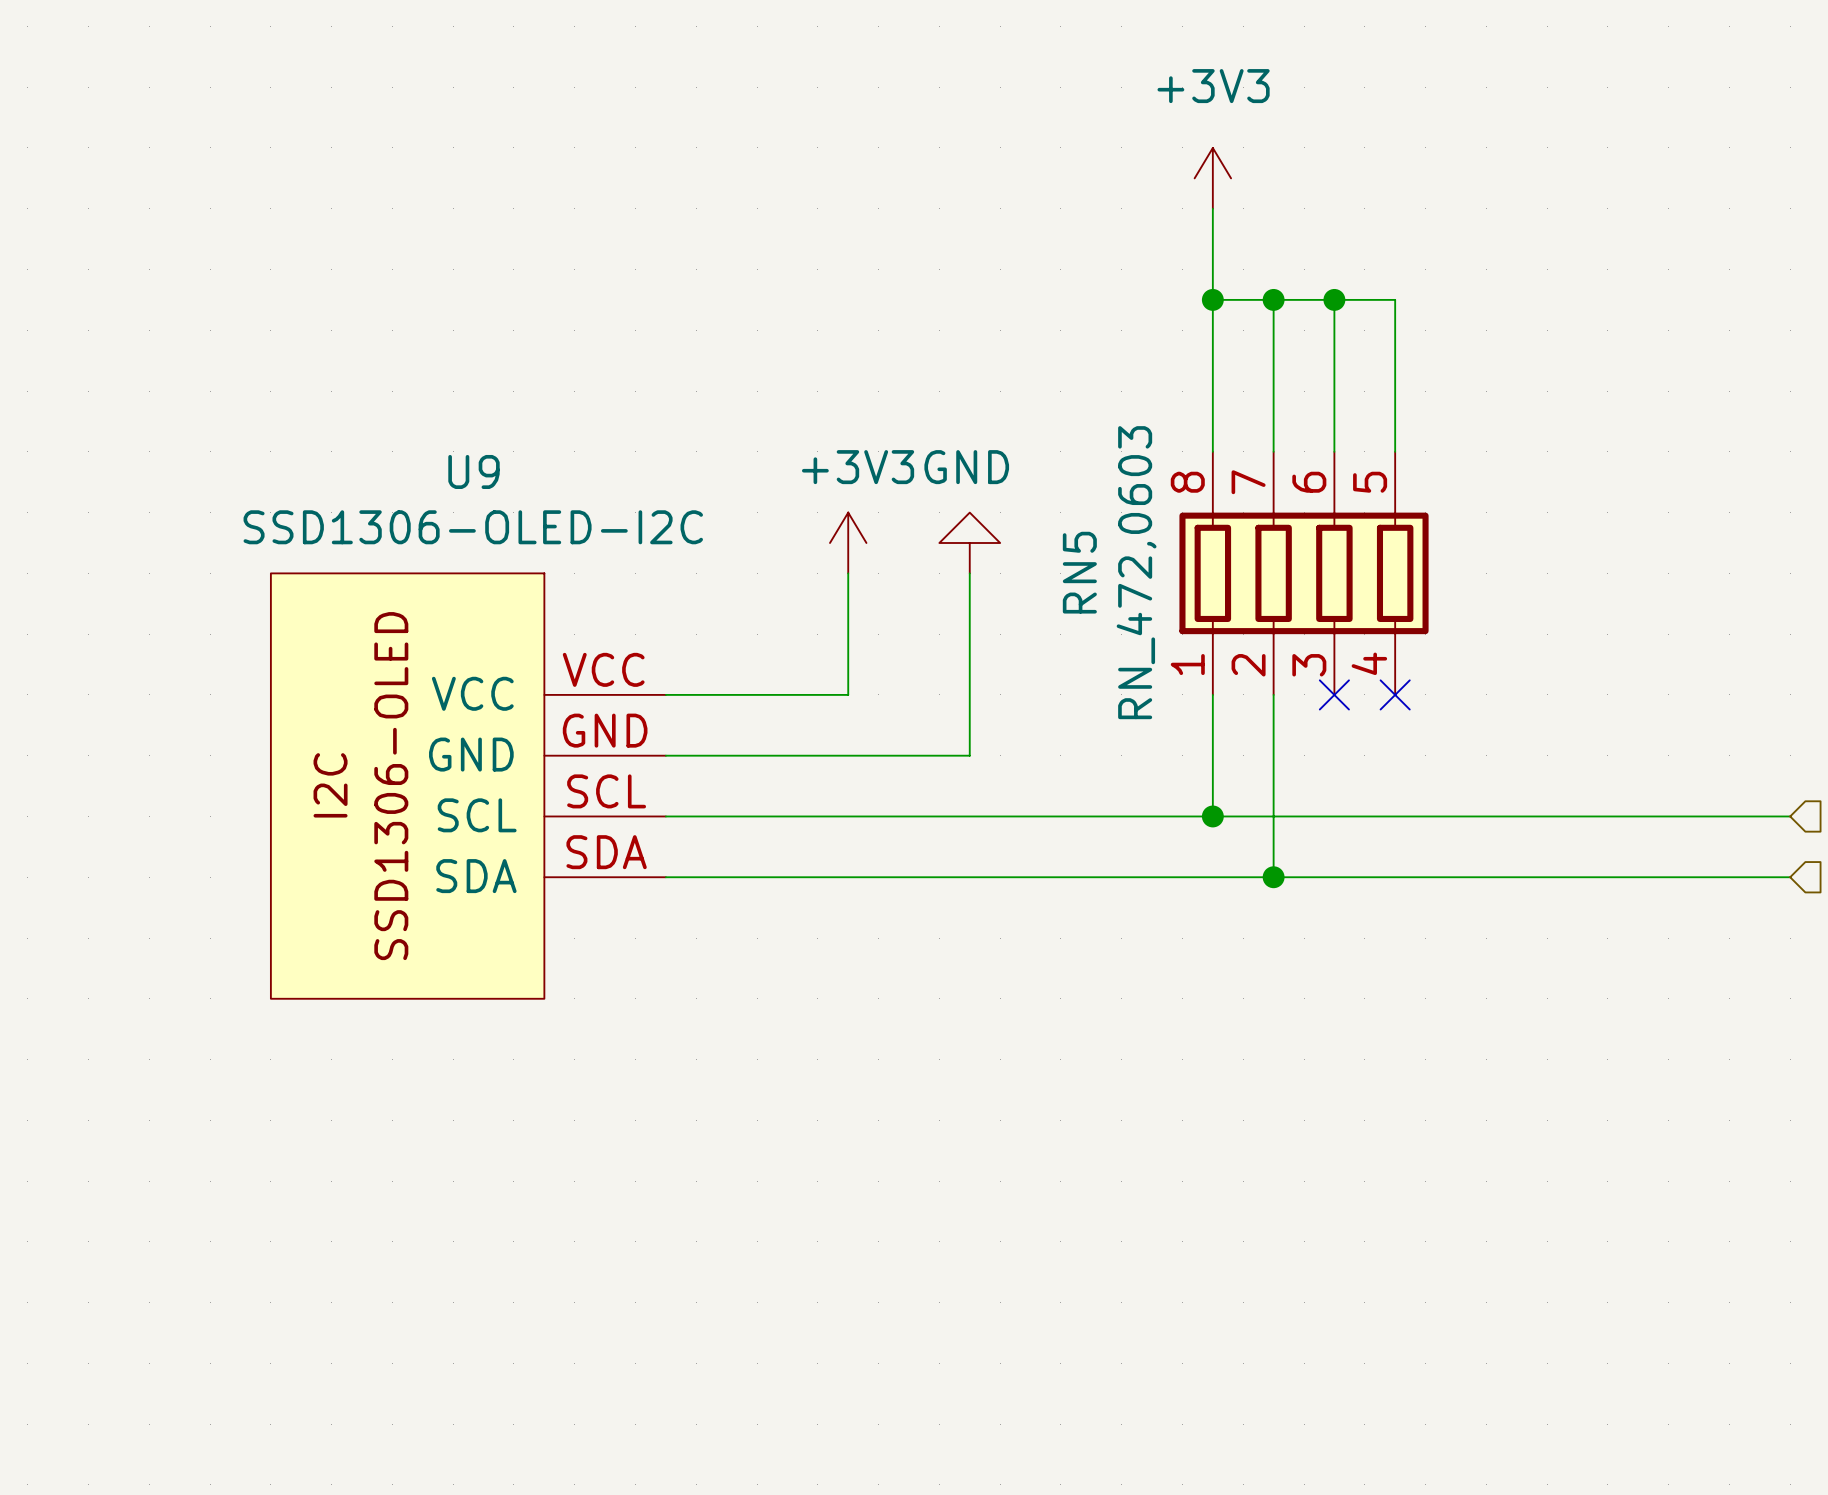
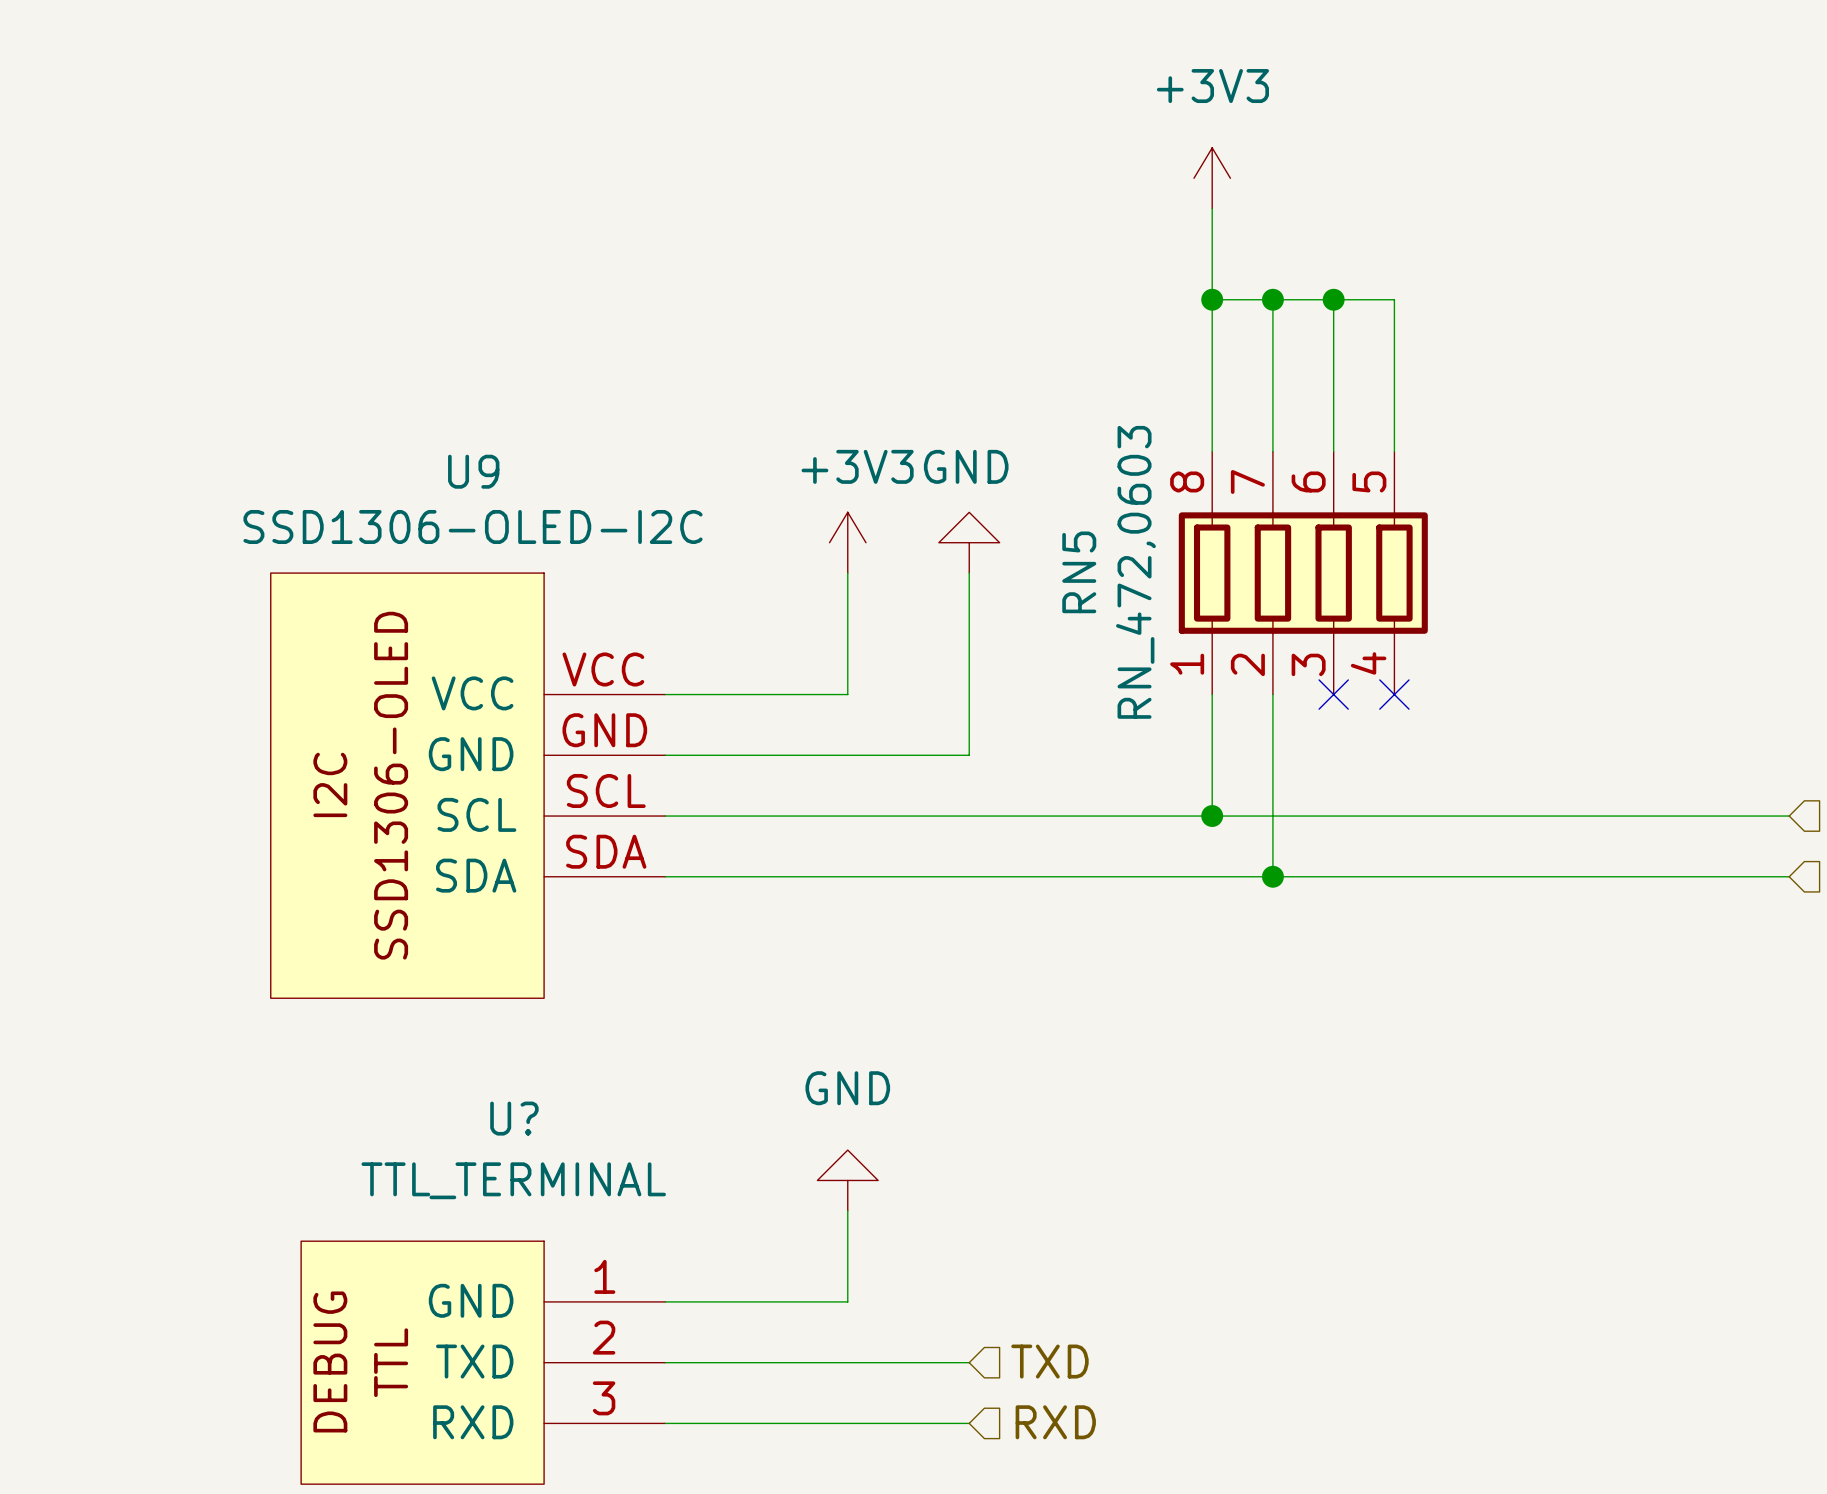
power symbol: none -> GND (847, 1180)
wire: none -> (847, 1210) (847, 1301) (665, 1301)
hierarchical label: none -> TXD (1049, 1361)
U?: none -> TTL_TERMINAL (483, 1362)
wire: none -> (665, 1362) (969, 1362)
hierarchical label: none -> RXD (1055, 1422)
wire: none -> (665, 1423) (969, 1423)

